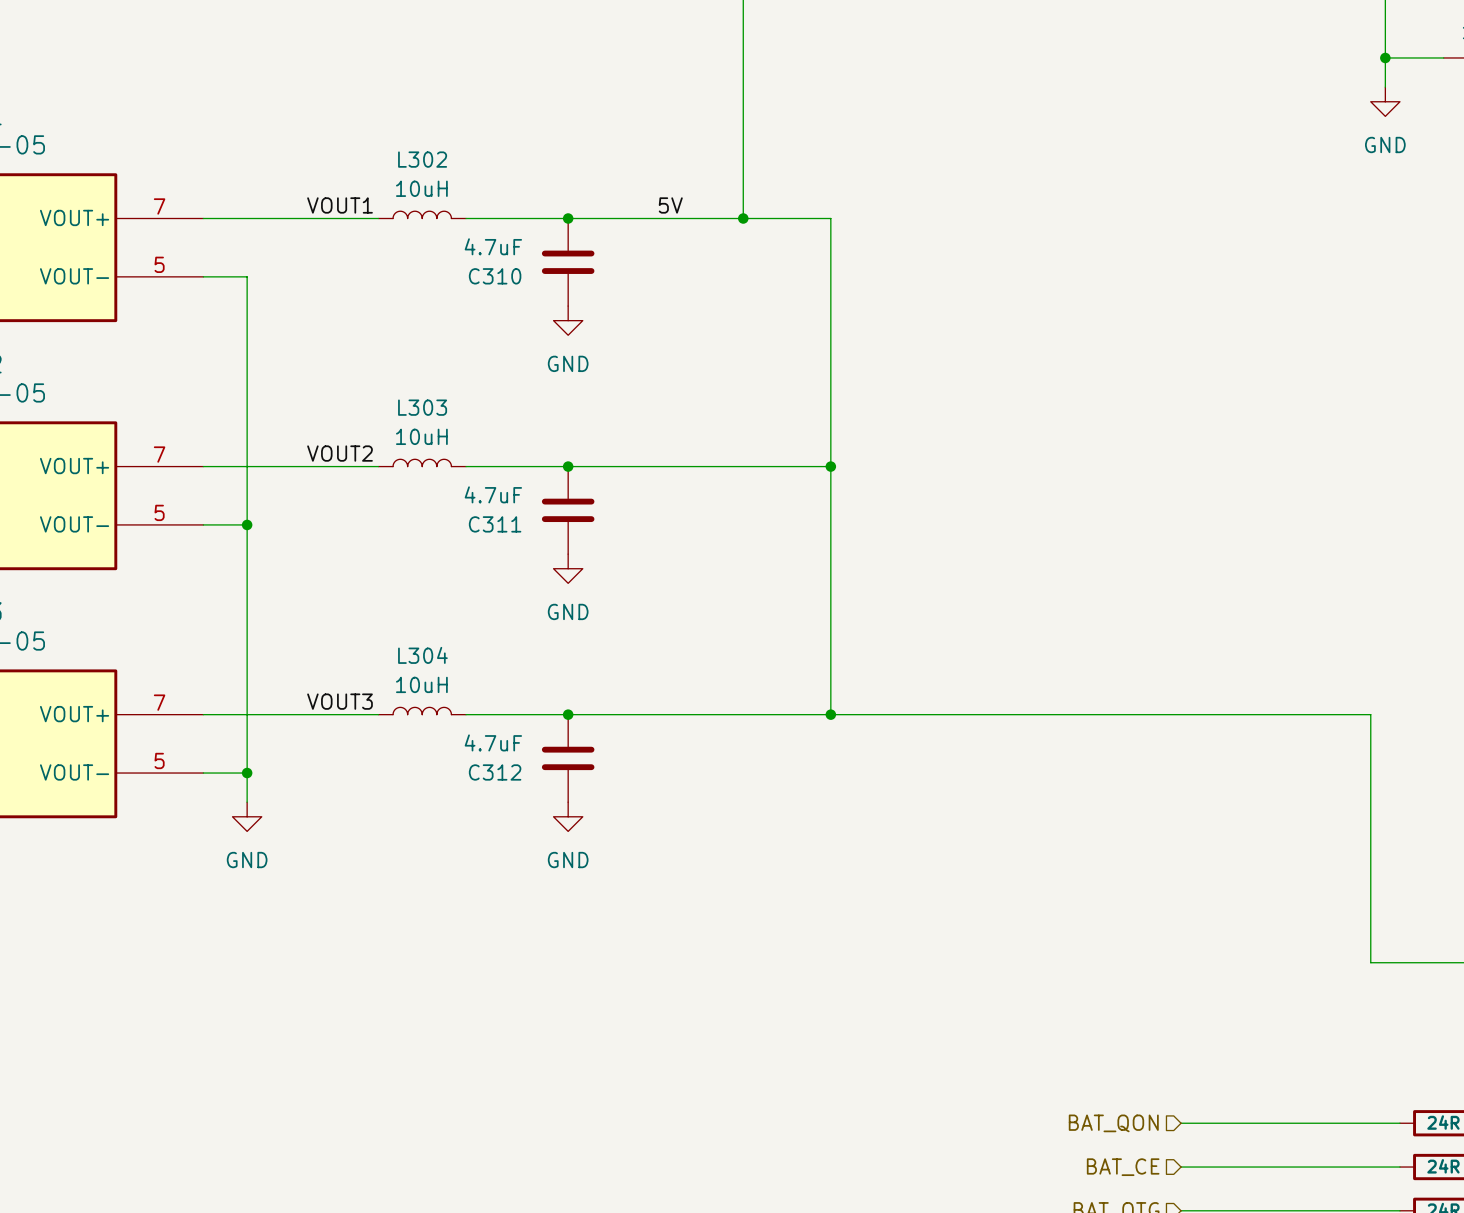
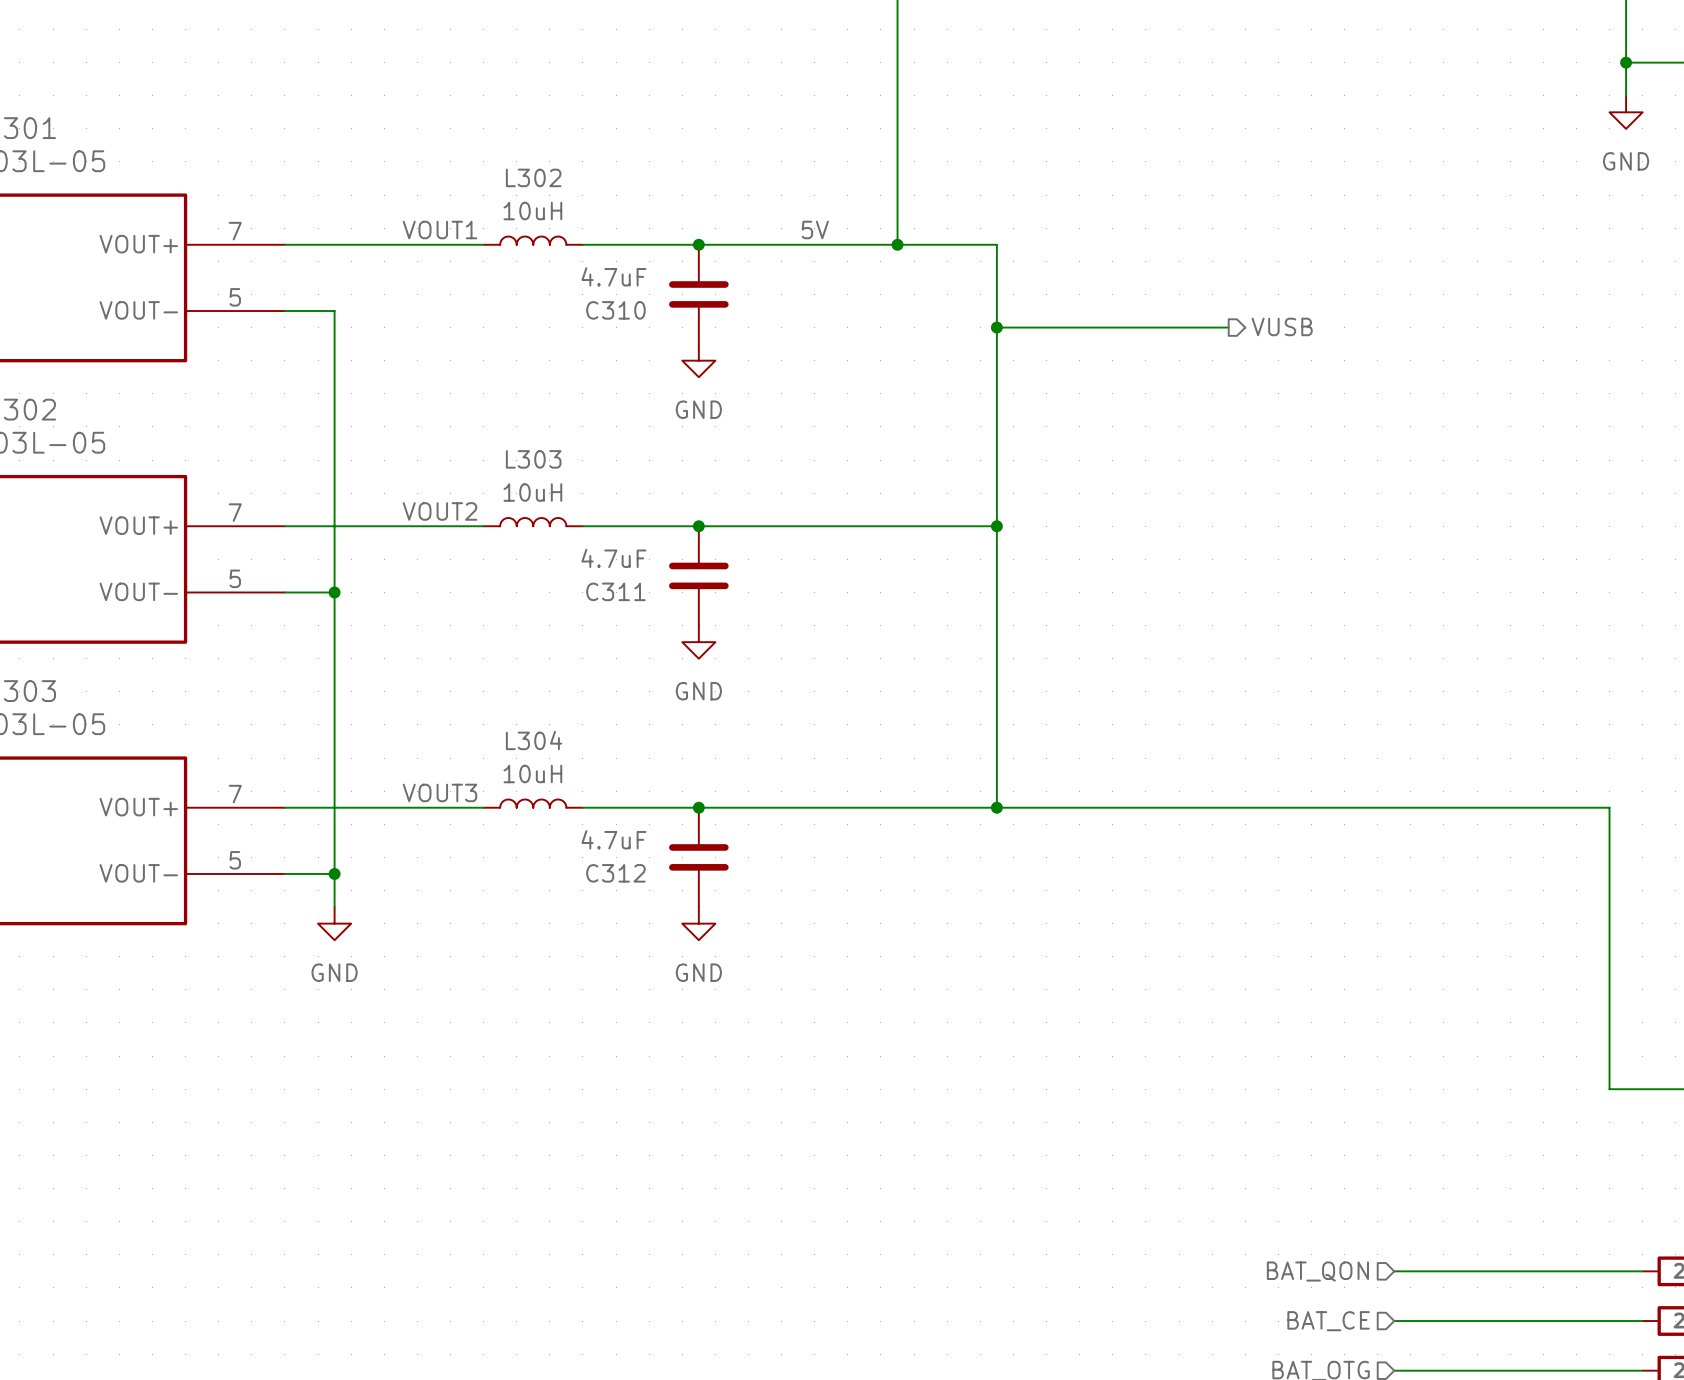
hierarchical label: none -> VUSB (1282, 326)
wire: none -> (996, 327) (1228, 327)
junction: none -> (996, 327)

